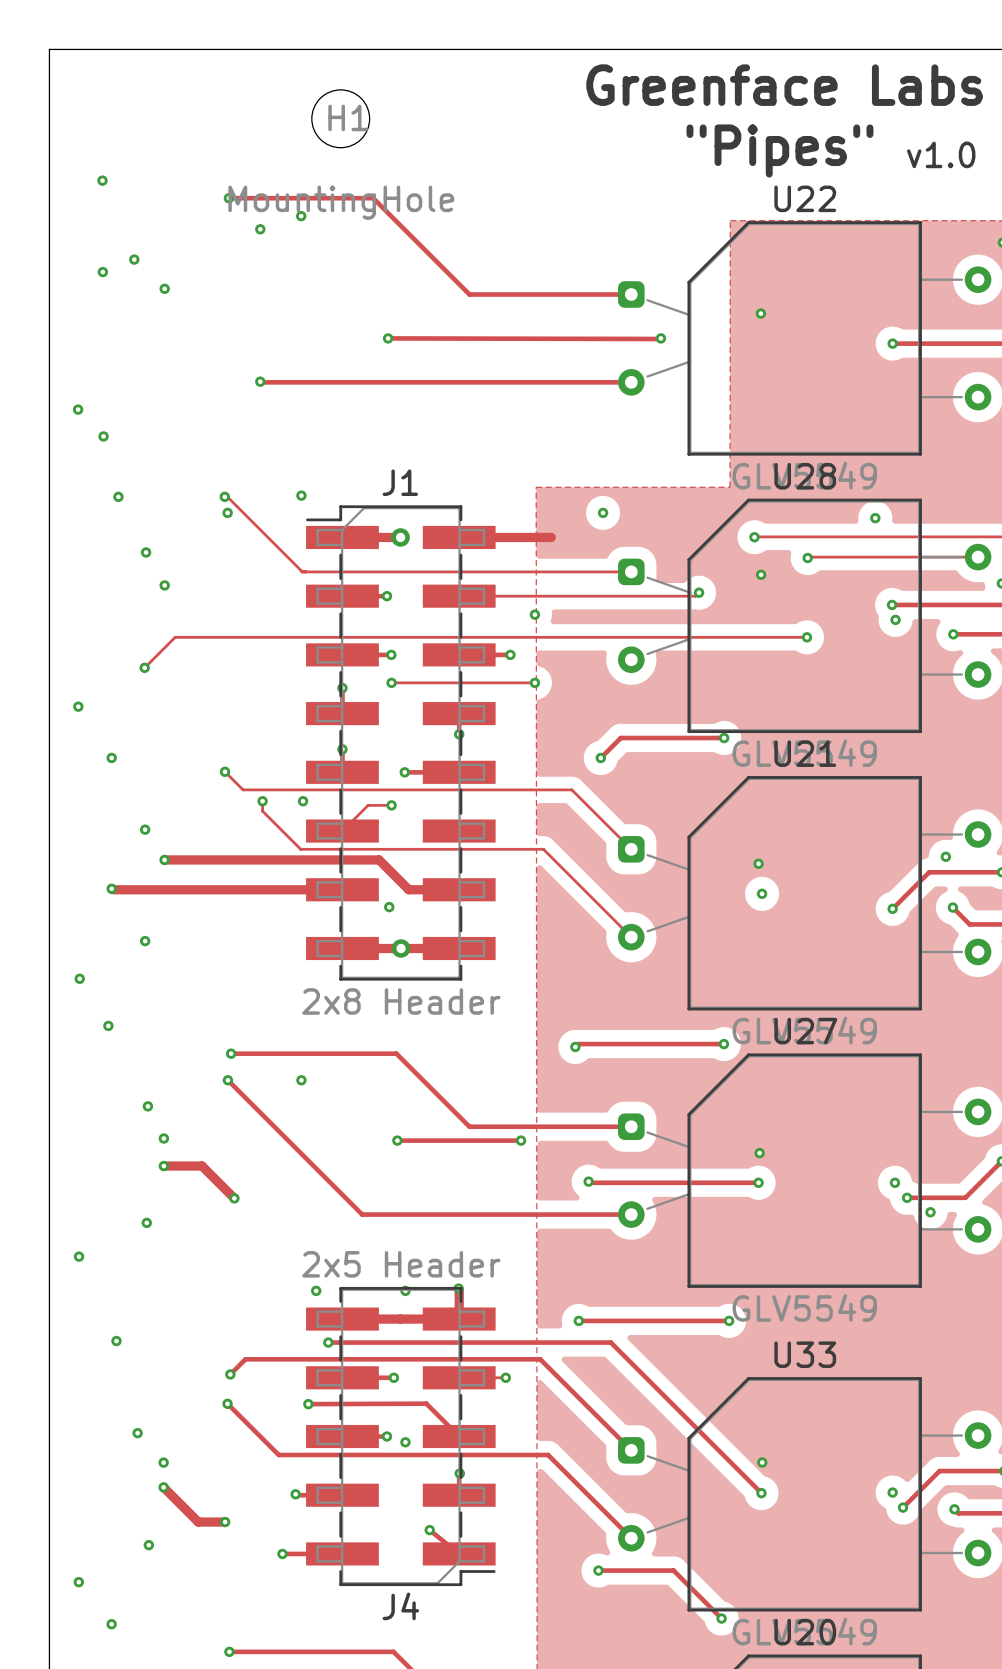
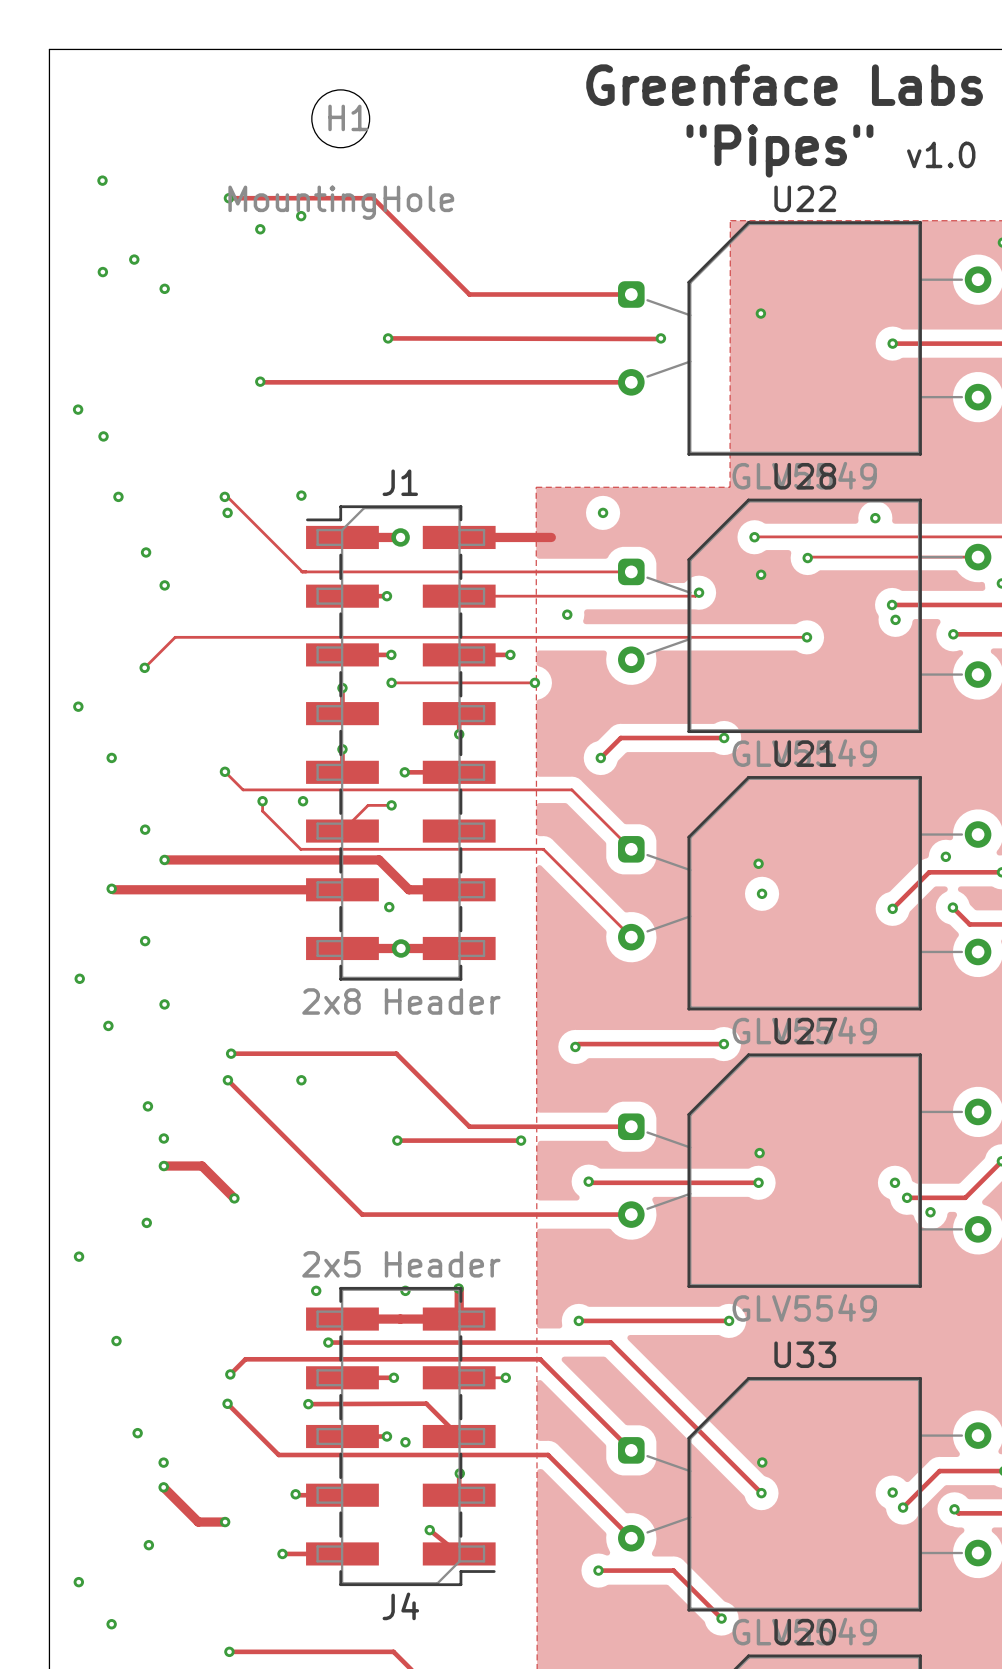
via position: (534, 614) -> (567, 614)
via: none -> (164, 1004)

